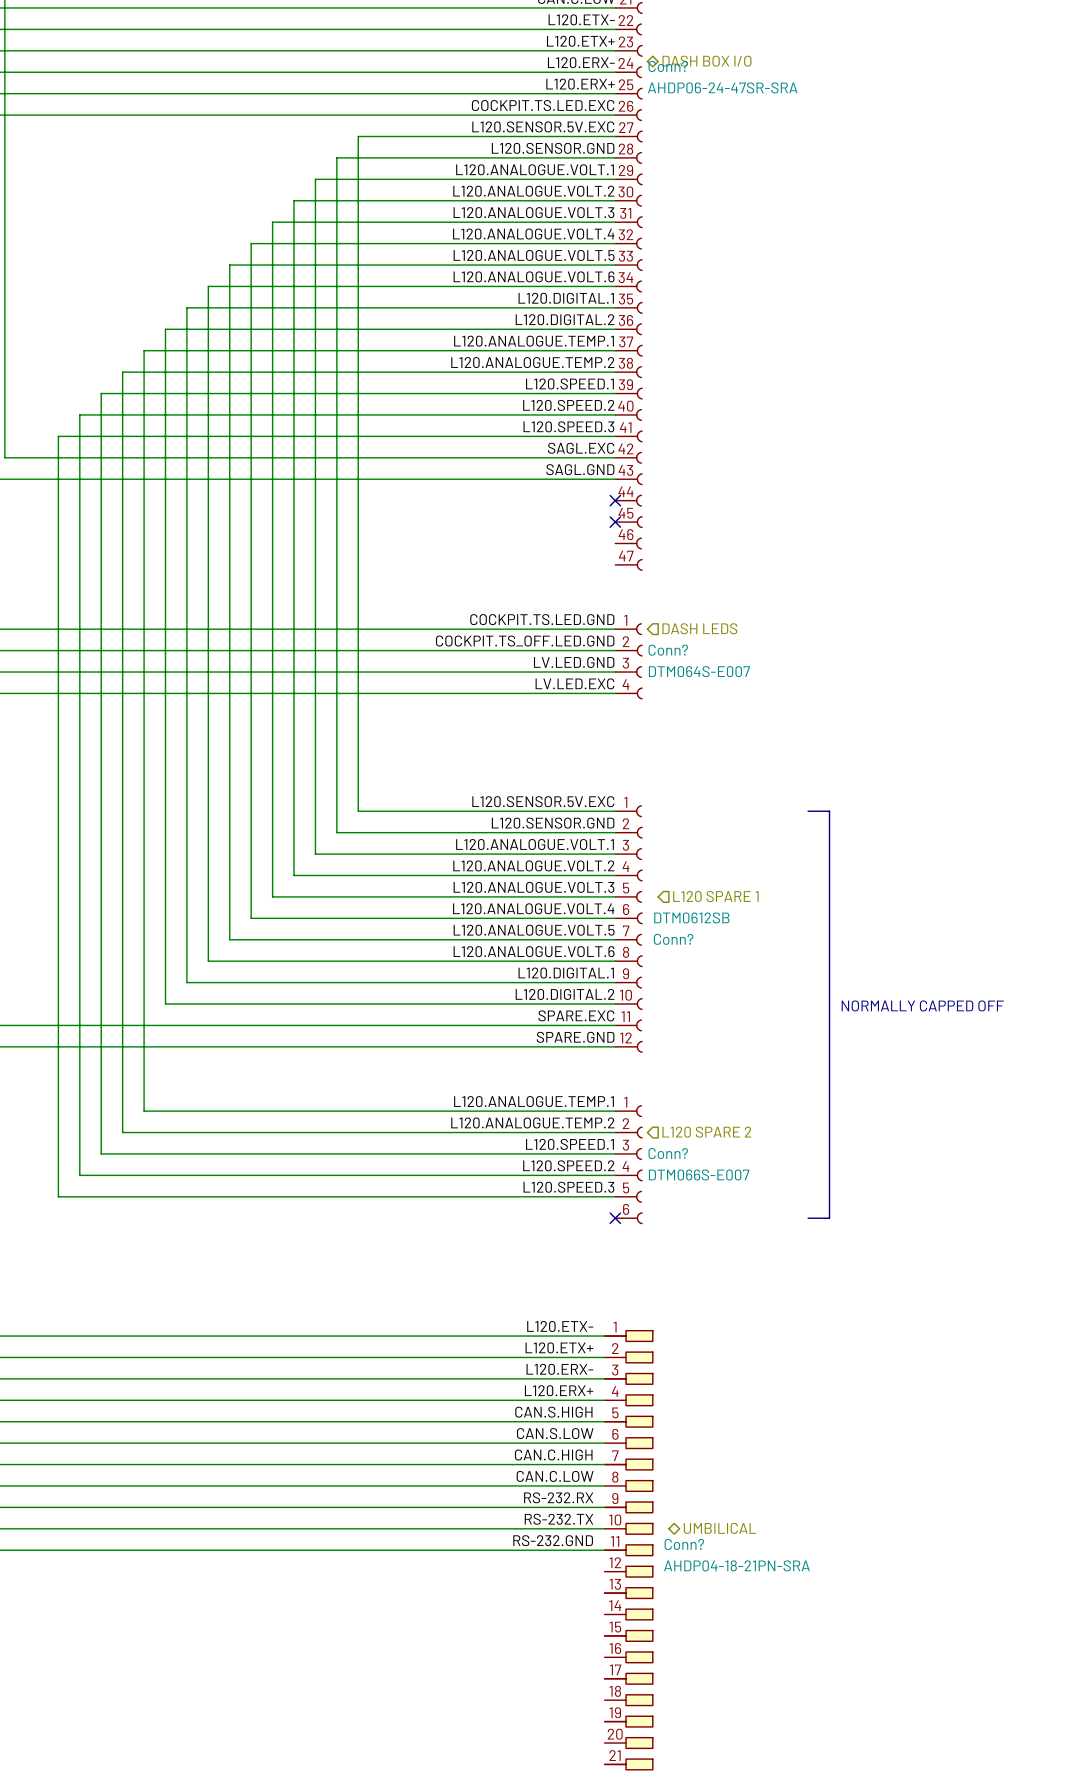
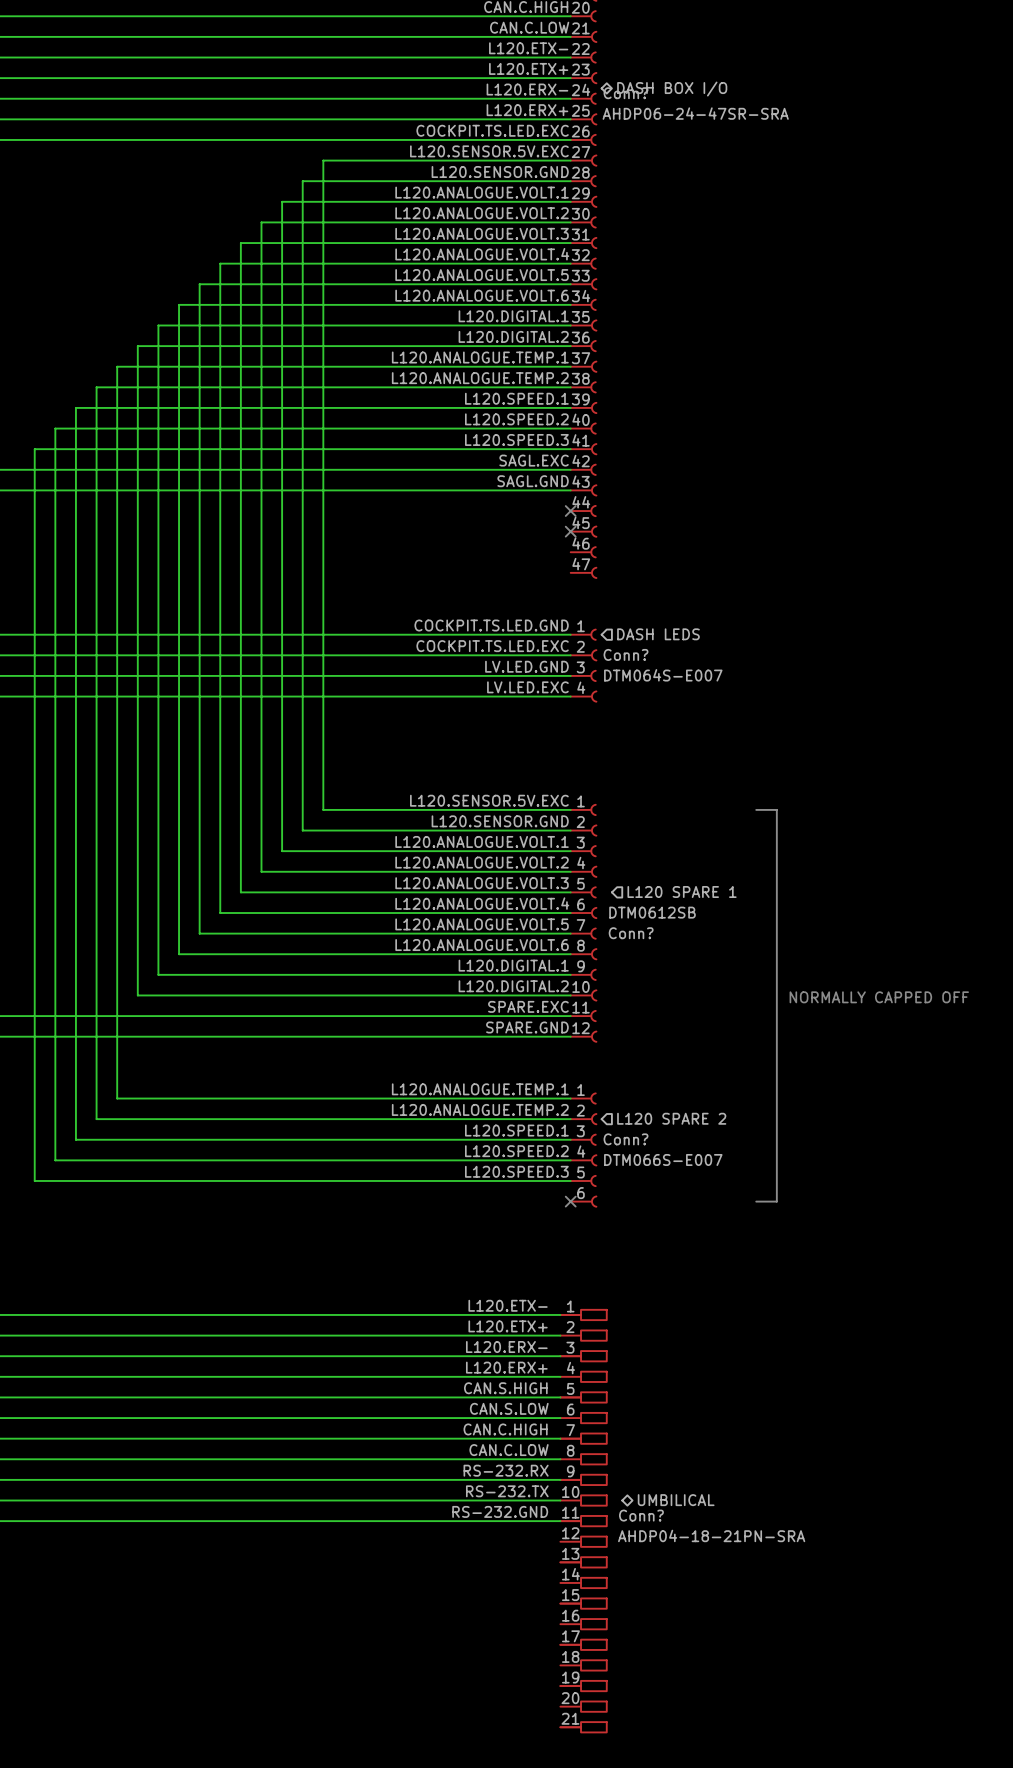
label: COCKPIT.TS_OFF.LED.GND (525, 641) -> COCKPIT.TS.LED.EXC (492, 646)

